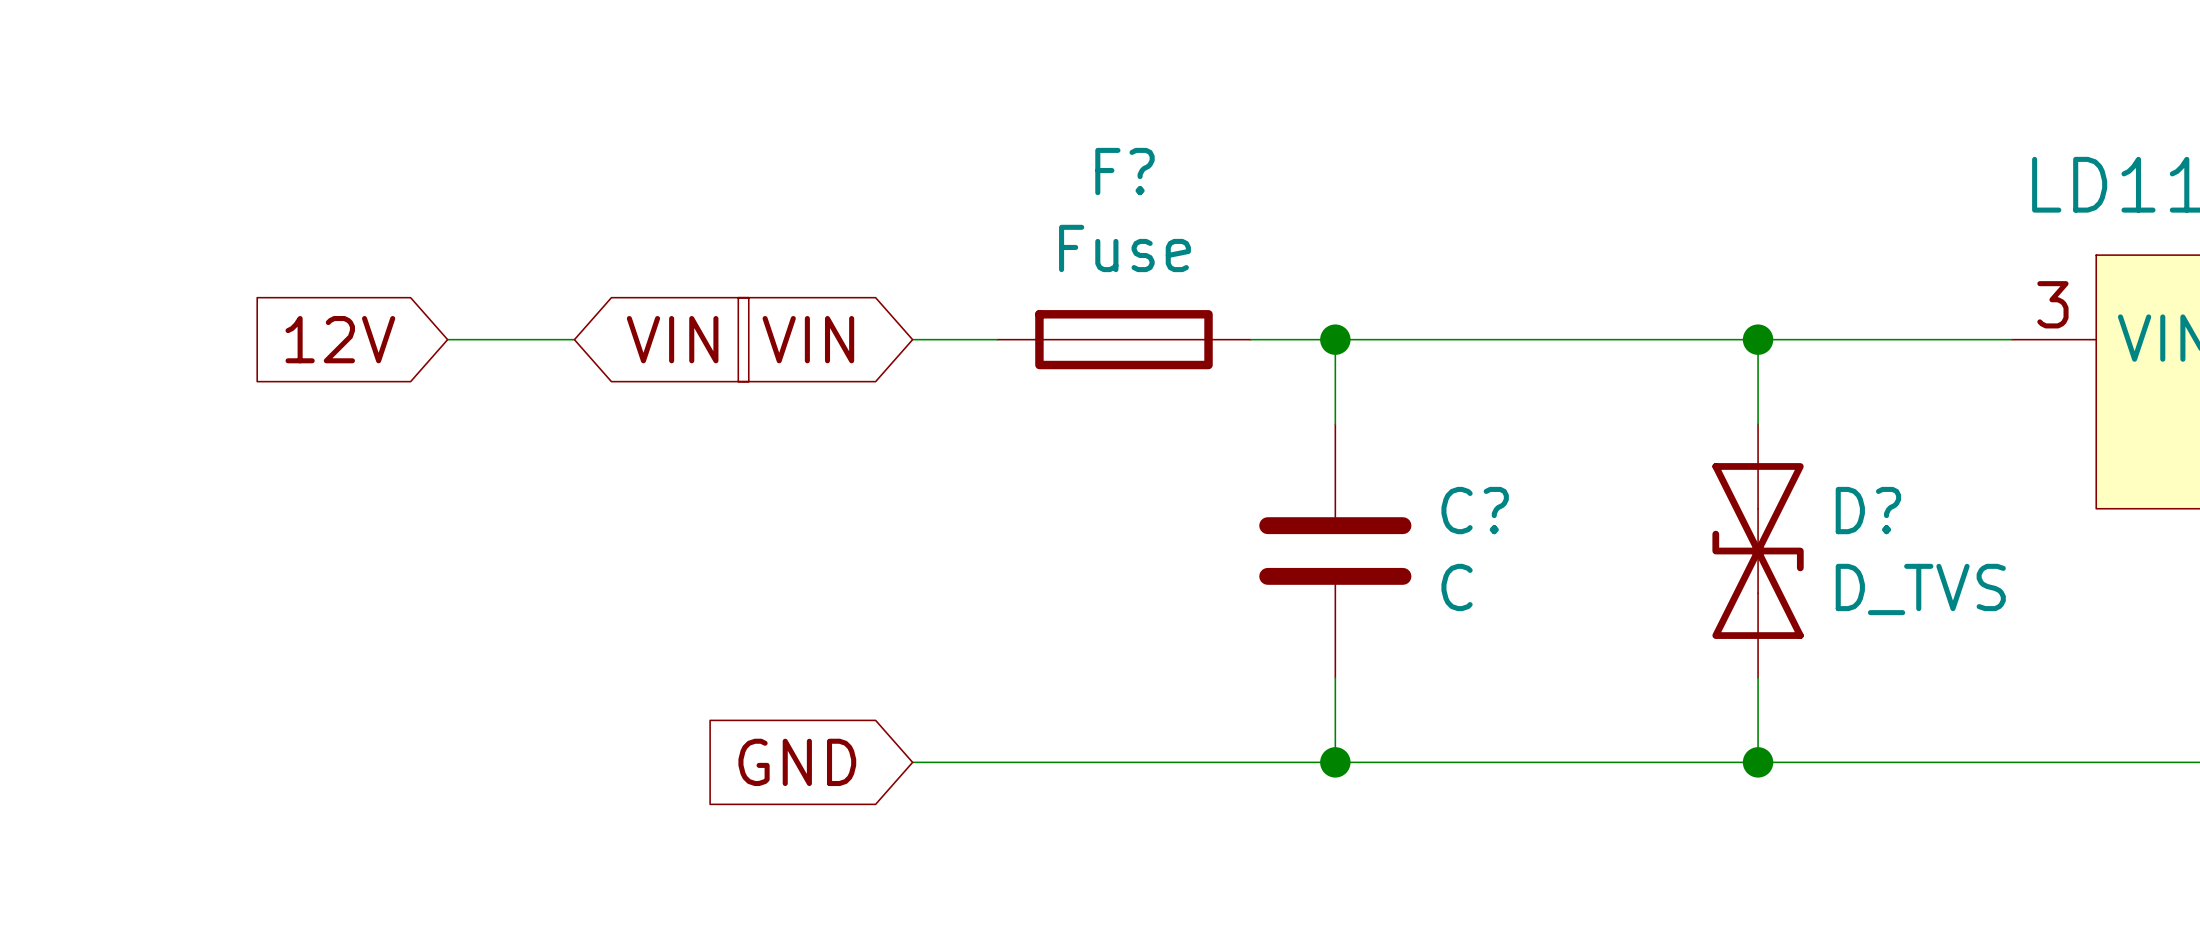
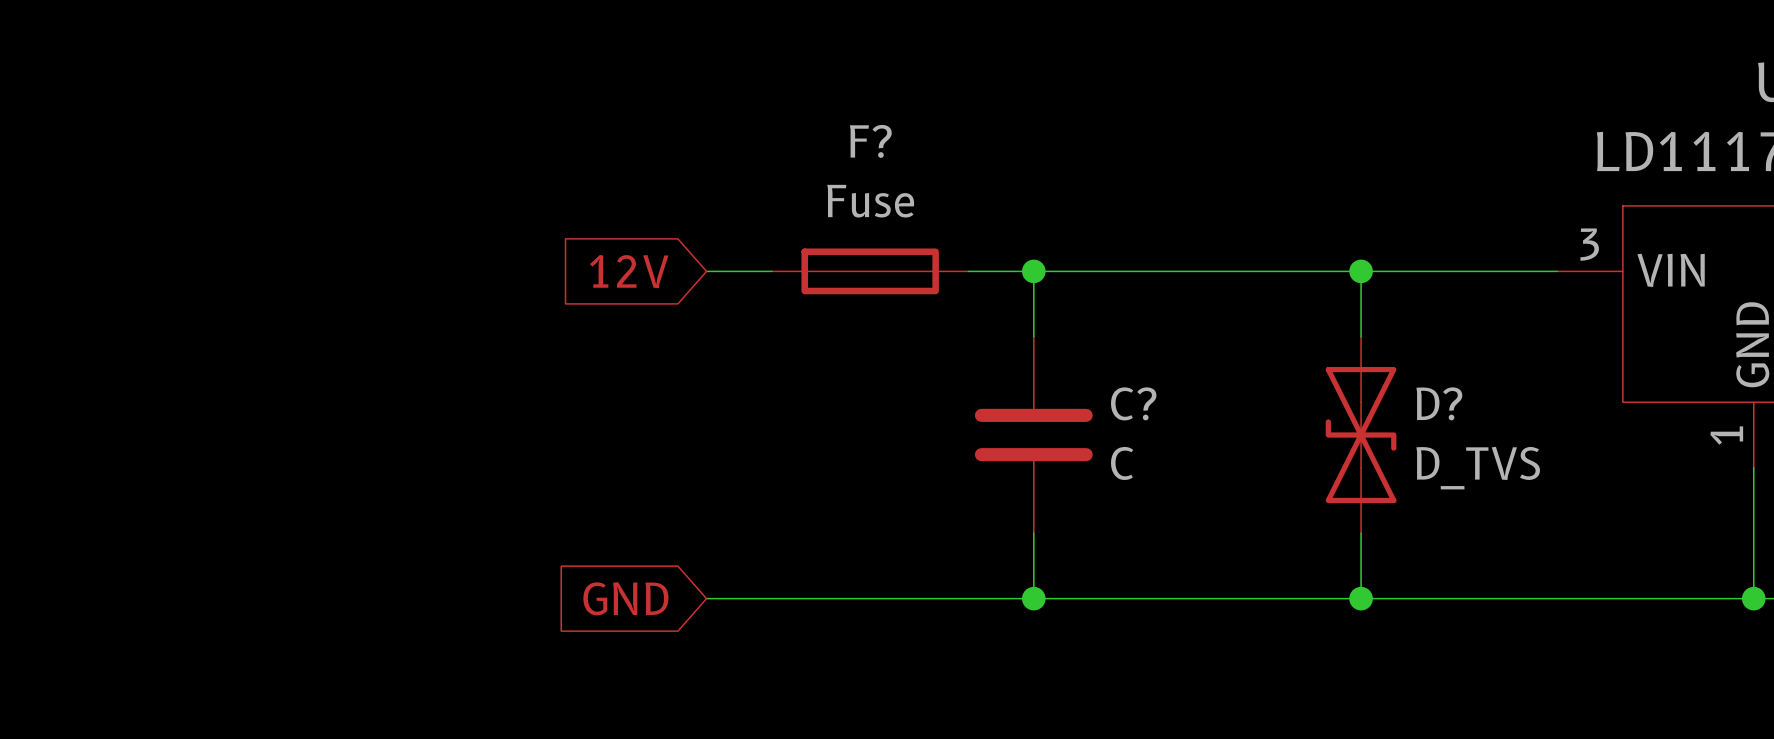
global label: 12V (340, 339) -> none
wire: (447, 339) (574, 339) -> none
global label: VIN (672, 339) -> none
global label: VIN (808, 339) -> 12V (629, 271)

